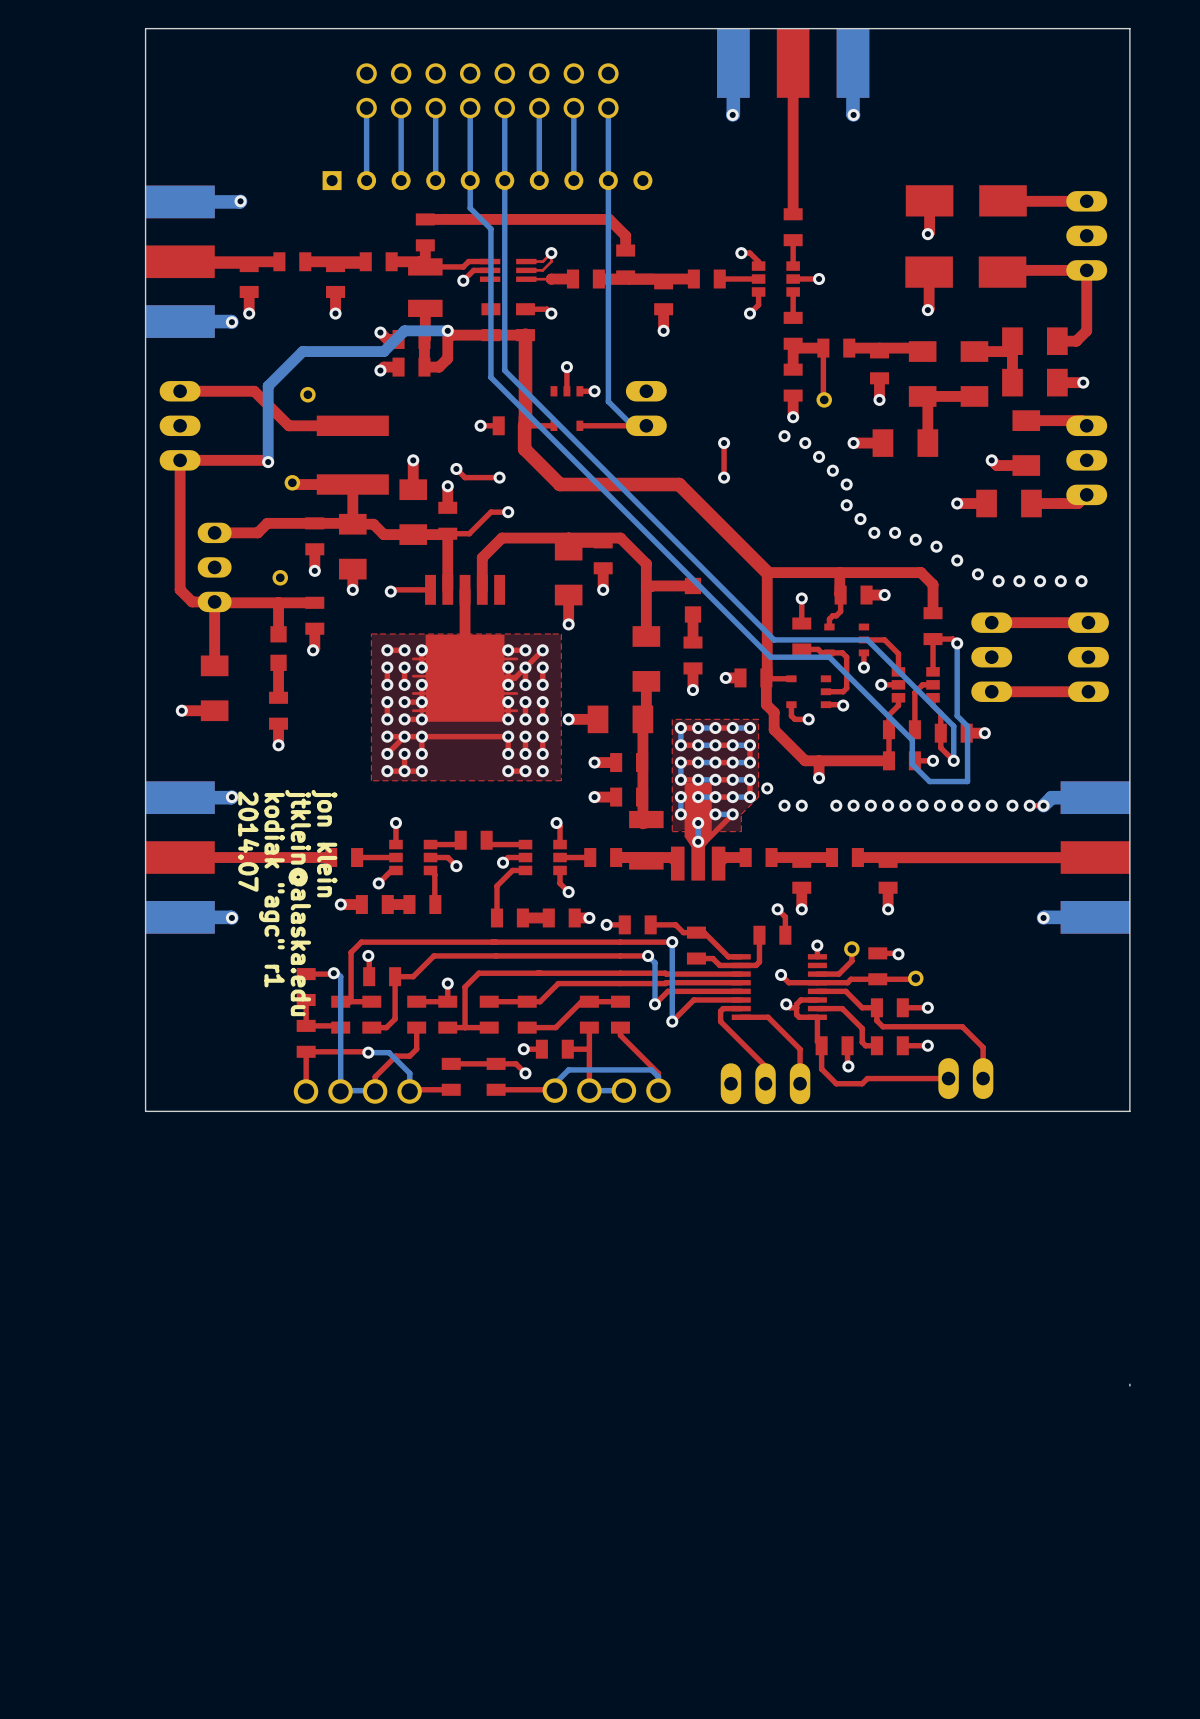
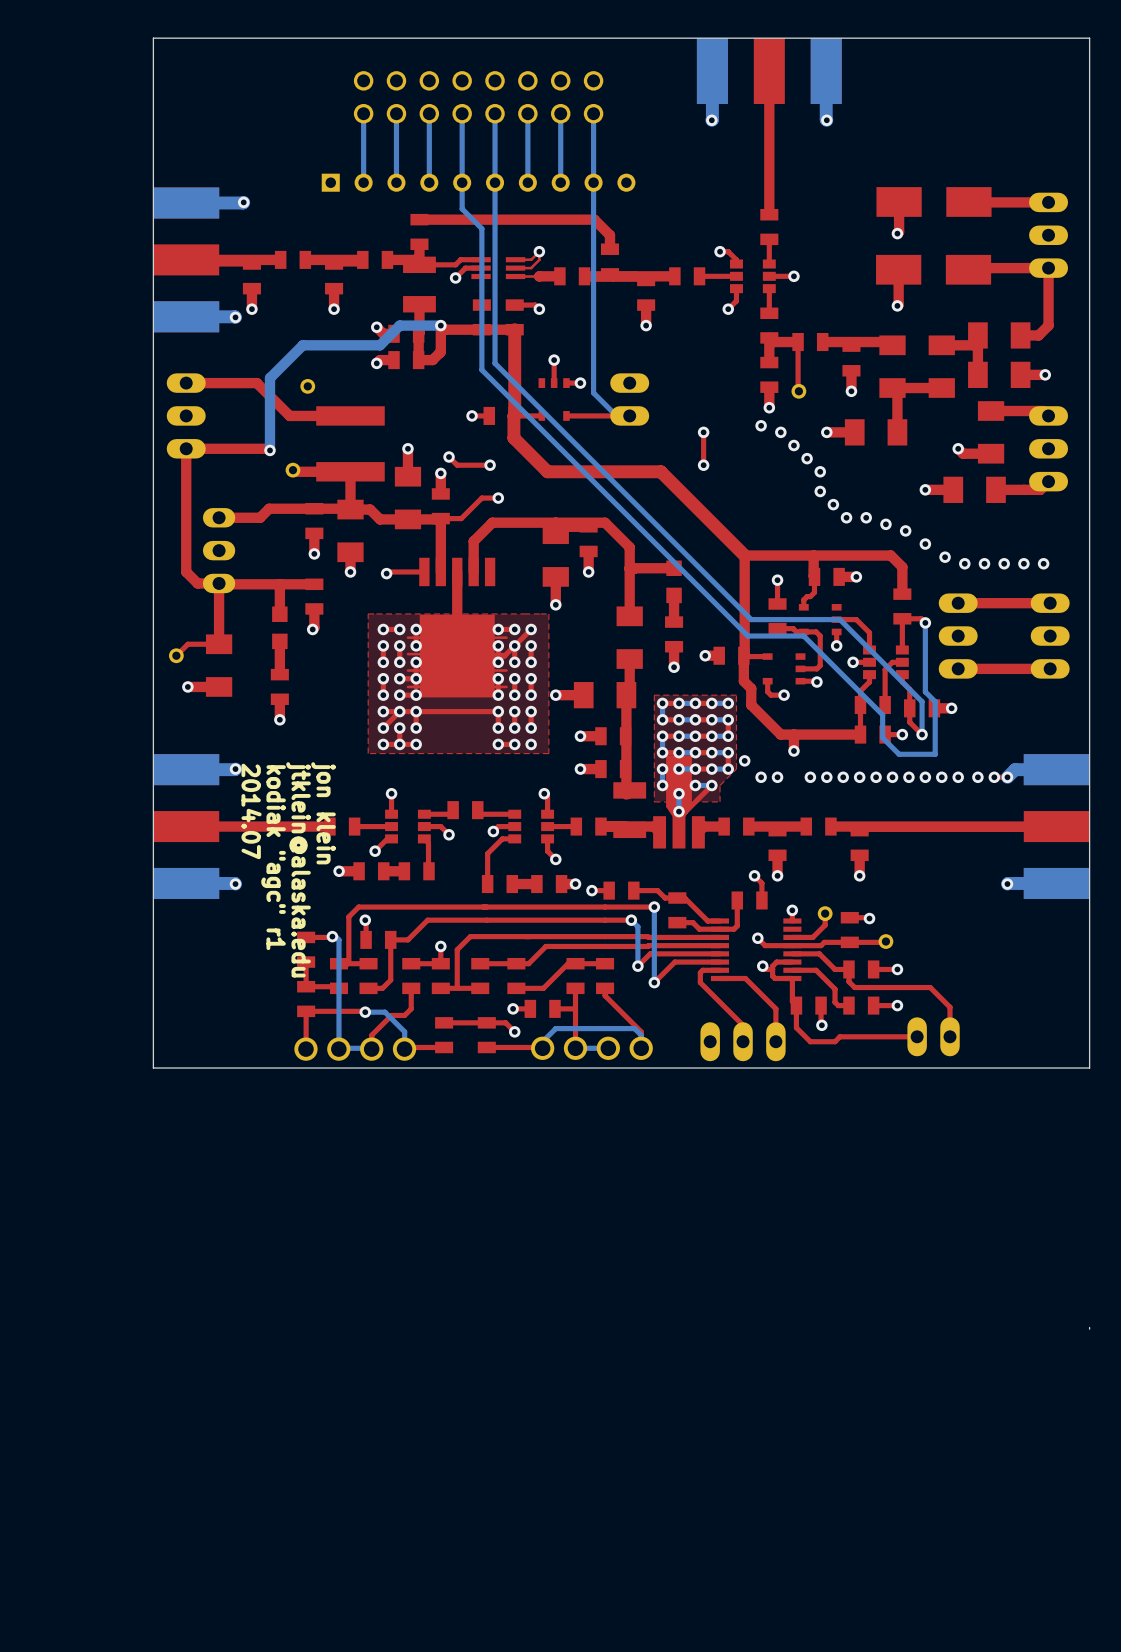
part position: (280, 577) -> (176, 655)
top track: none -> (219, 644) (187, 644) (176, 655)

